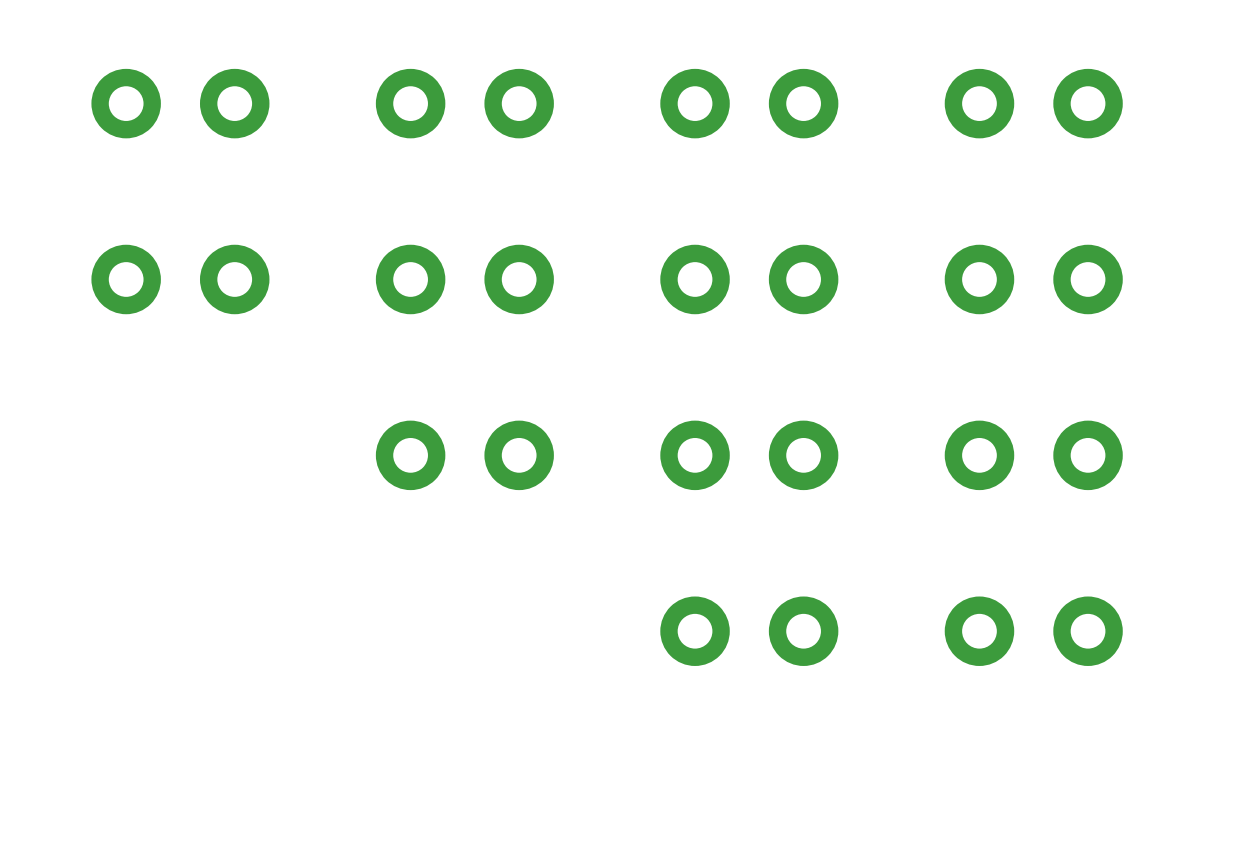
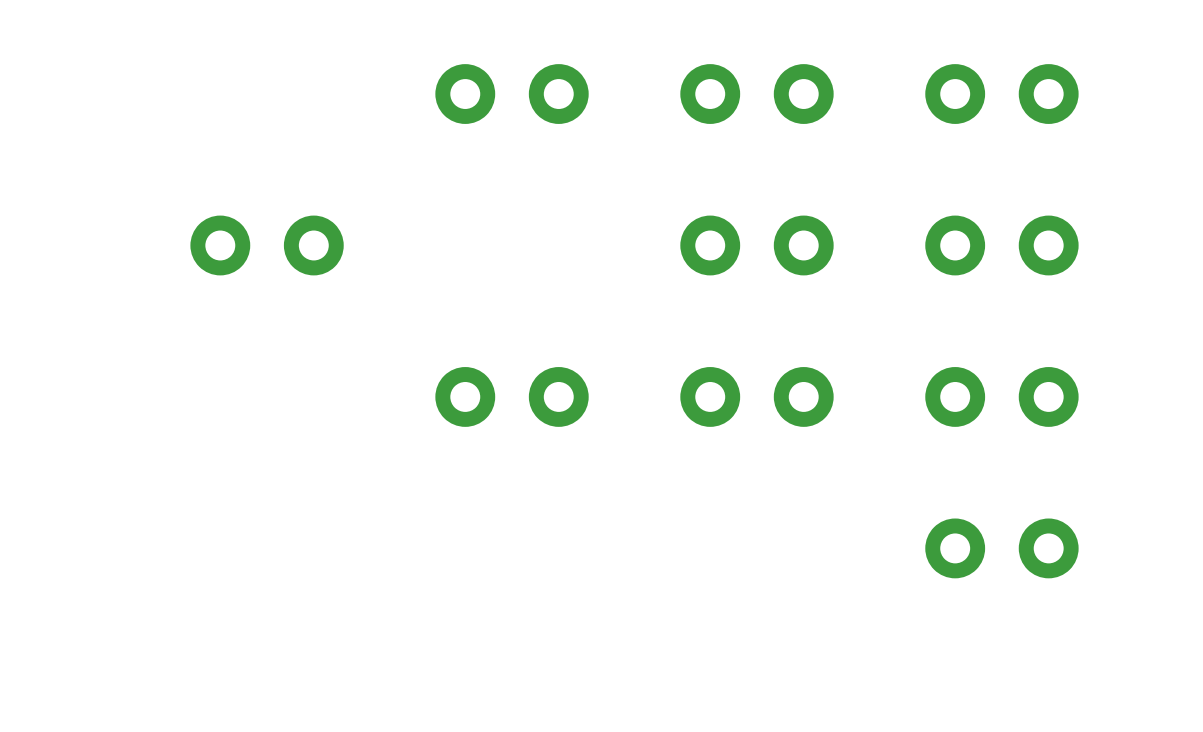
part: (180, 103) -> none
part: (464, 279) -> none
part: (749, 631) -> none

